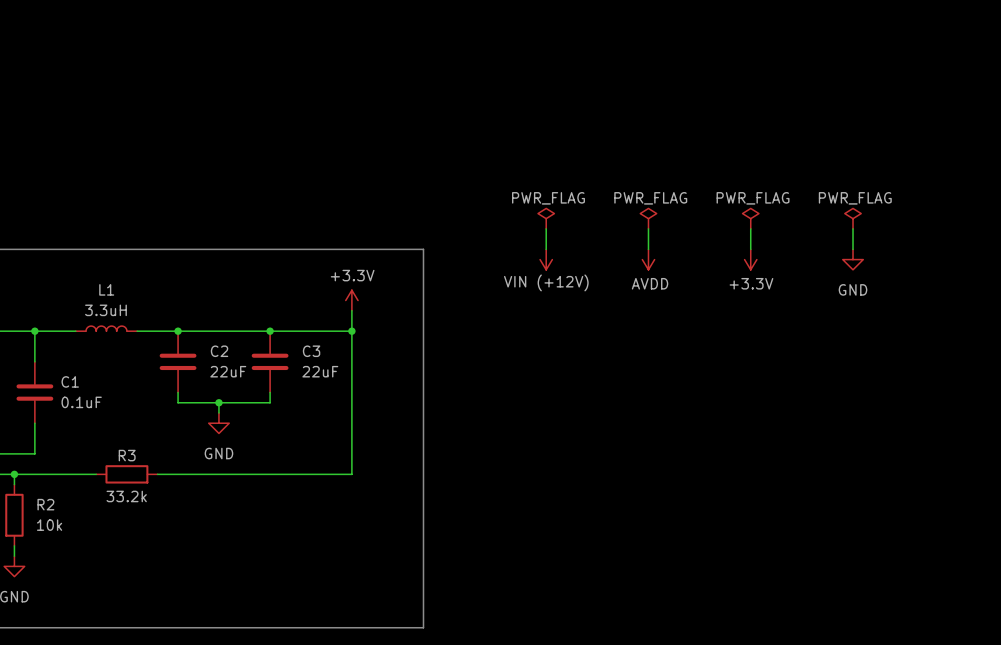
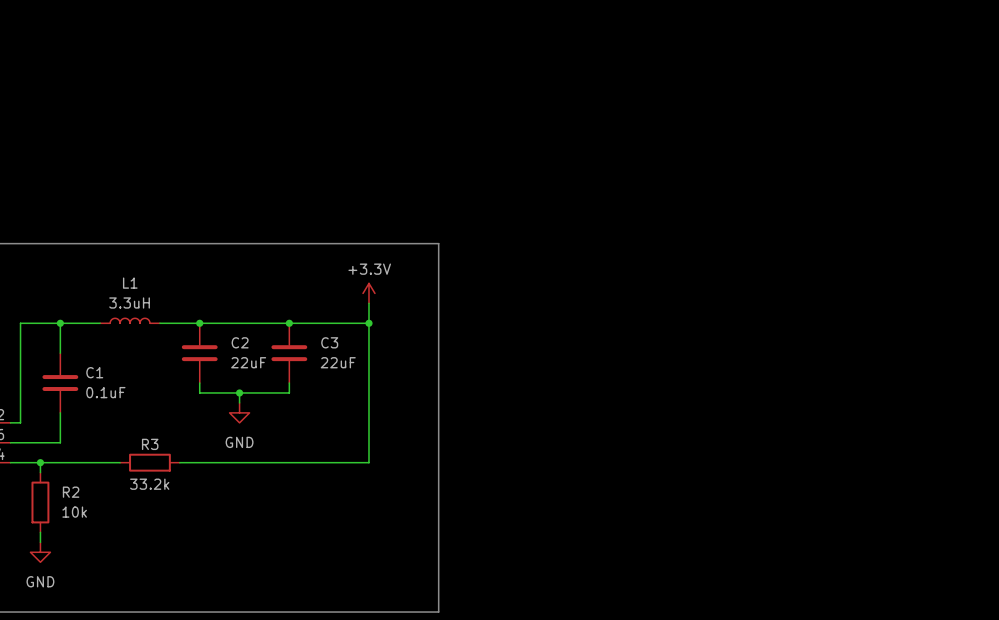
power symbol: PWR_FLAG (546, 218) -> none
power symbol: PWR_FLAG (648, 218) -> none
power symbol: PWR_FLAG (750, 218) -> none
power symbol: PWR_FLAG (853, 218) -> none
wire: (546, 228) (546, 249) -> none
wire: (648, 228) (648, 249) -> none
wire: (750, 228) (750, 249) -> none
wire: (853, 228) (853, 249) -> none
power symbol: VIN (+12V) (546, 259) -> none
power symbol: AVDD (648, 259) -> none
power symbol: +3.3V (750, 259) -> none
power symbol: GND (853, 259) -> none

